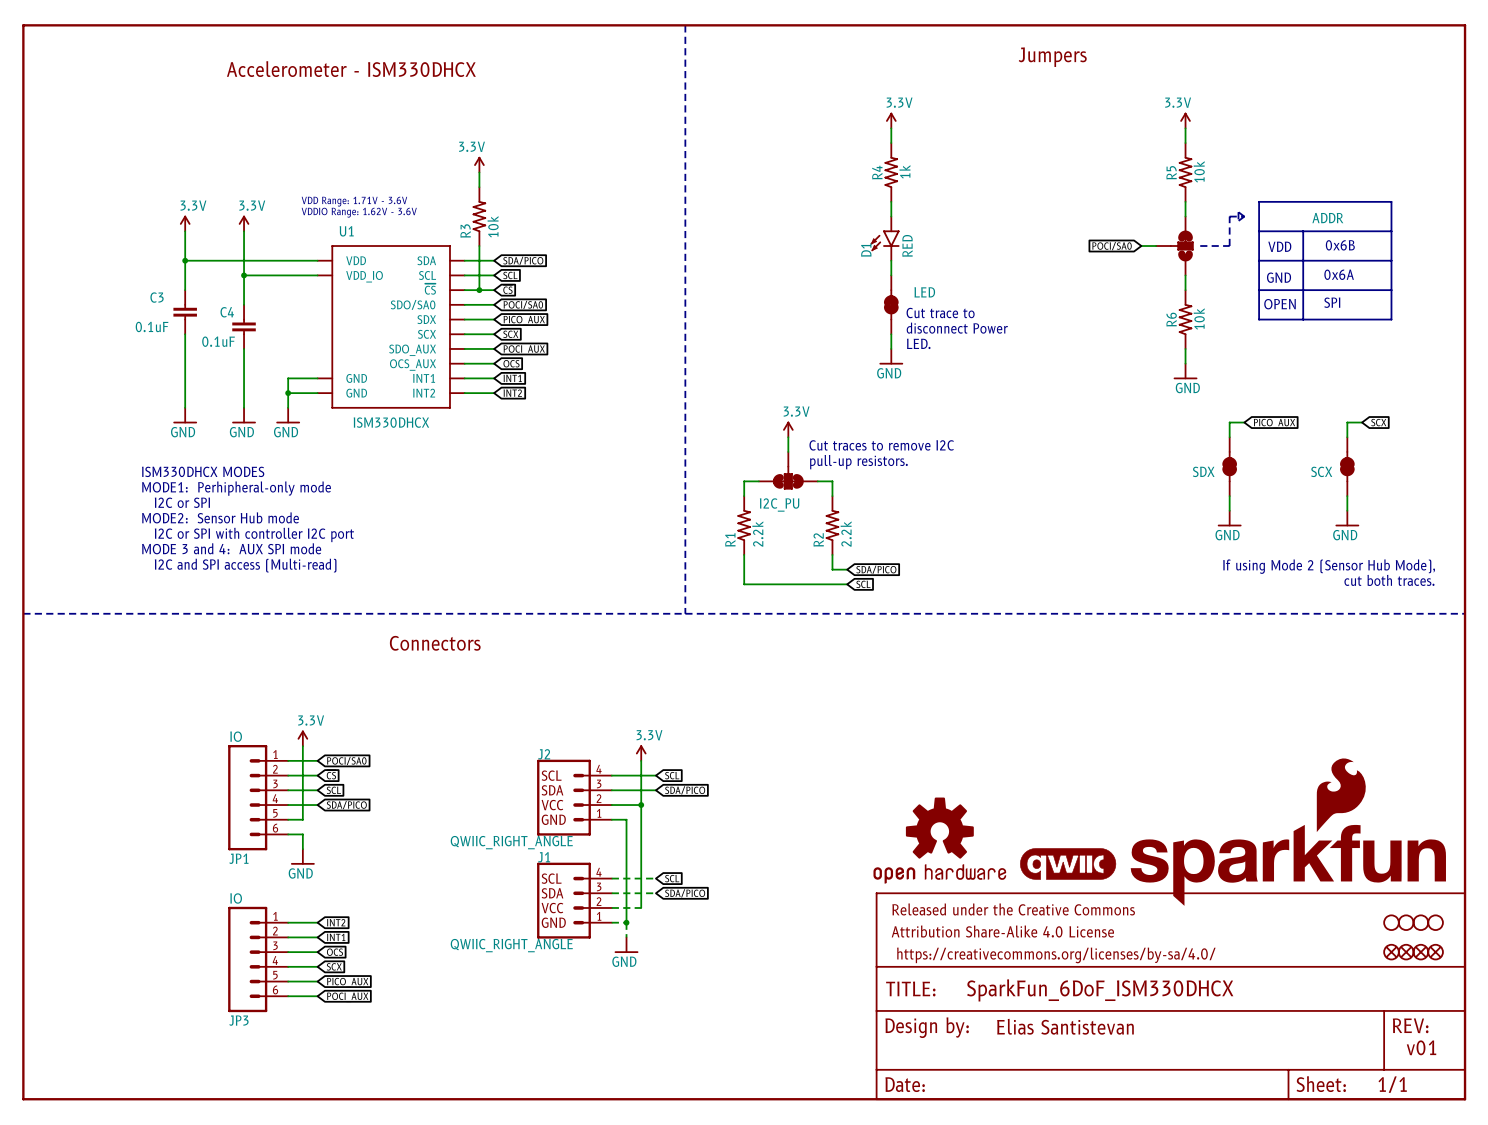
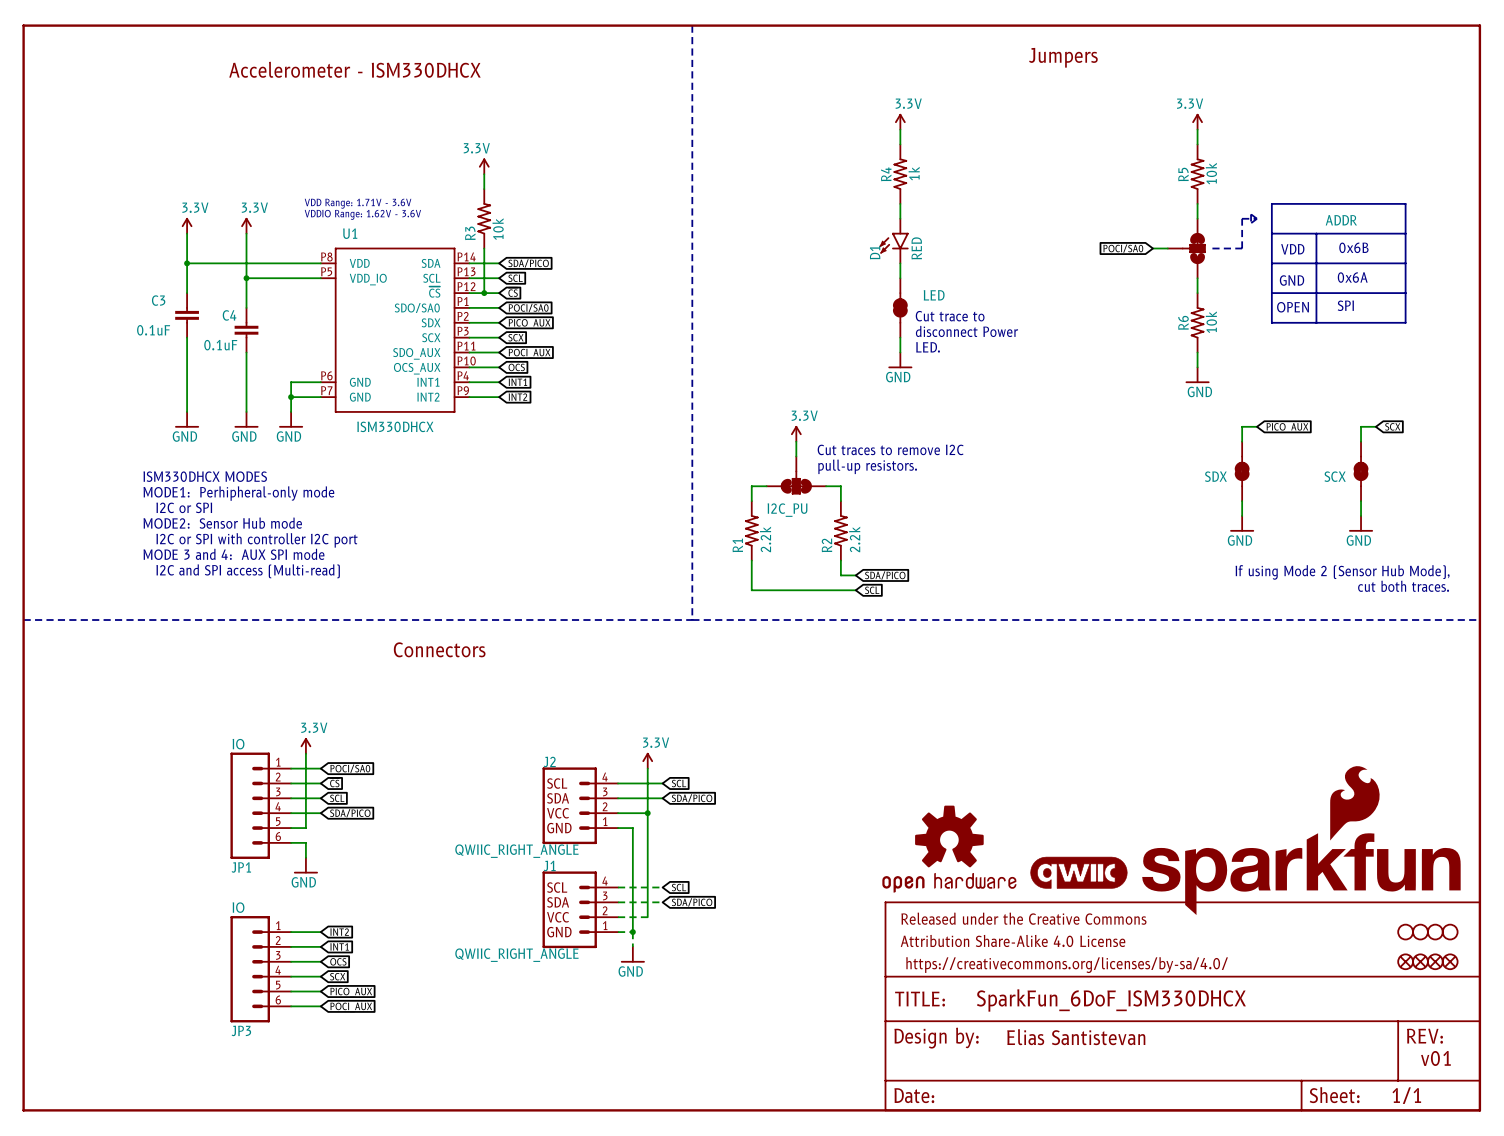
U1 symbol: [317, 245, 465, 409] -> [320, 248, 470, 413]

